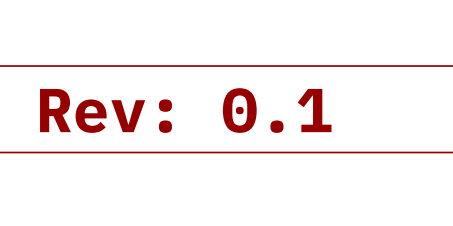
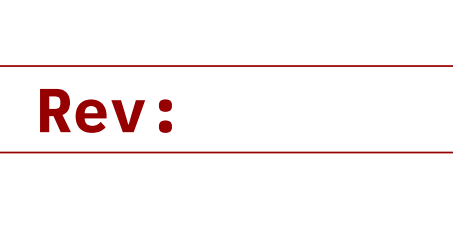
title block: Rev: 0.1 (185, 110) -> Rev: (105, 110)

